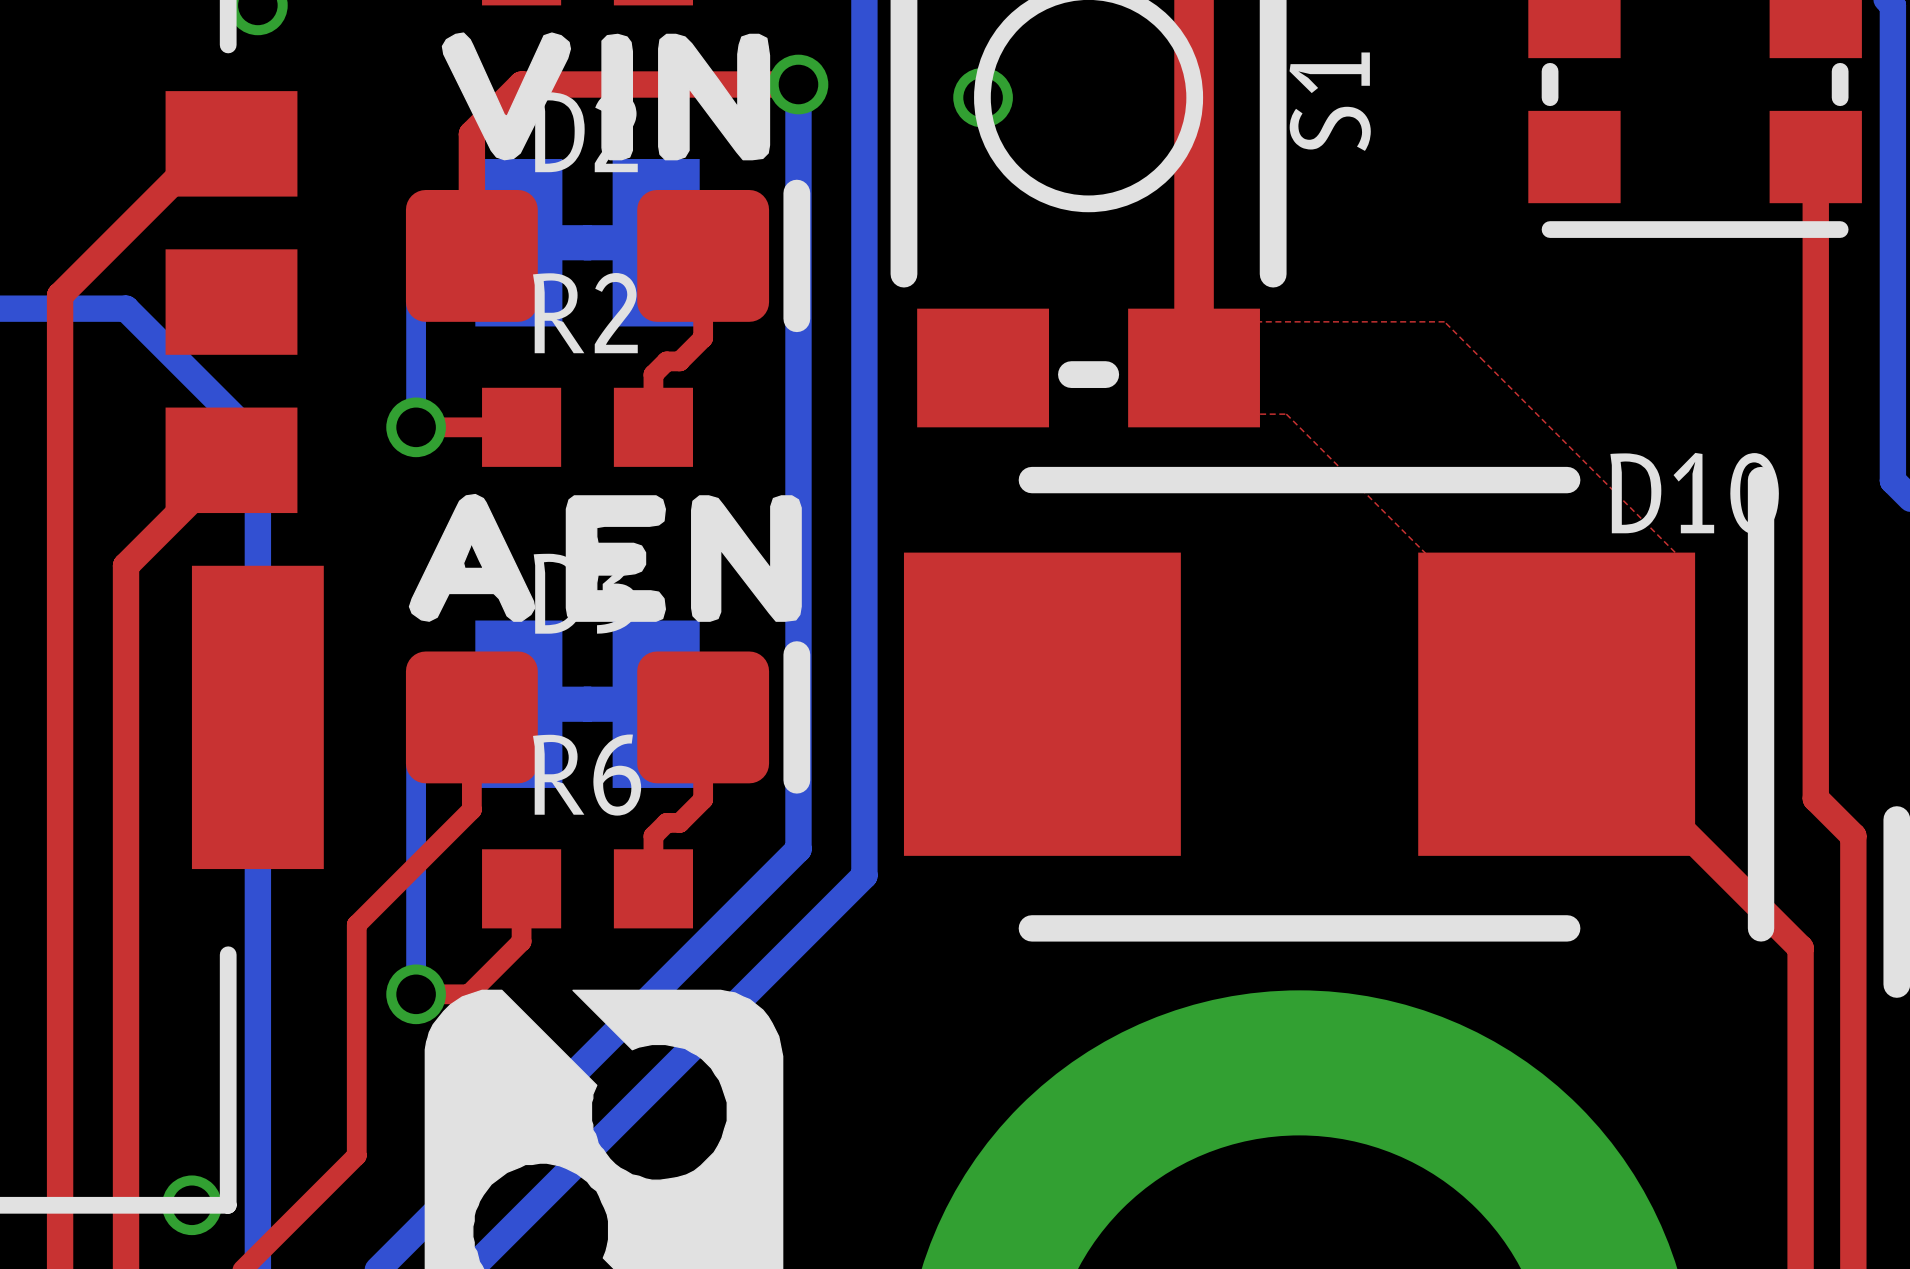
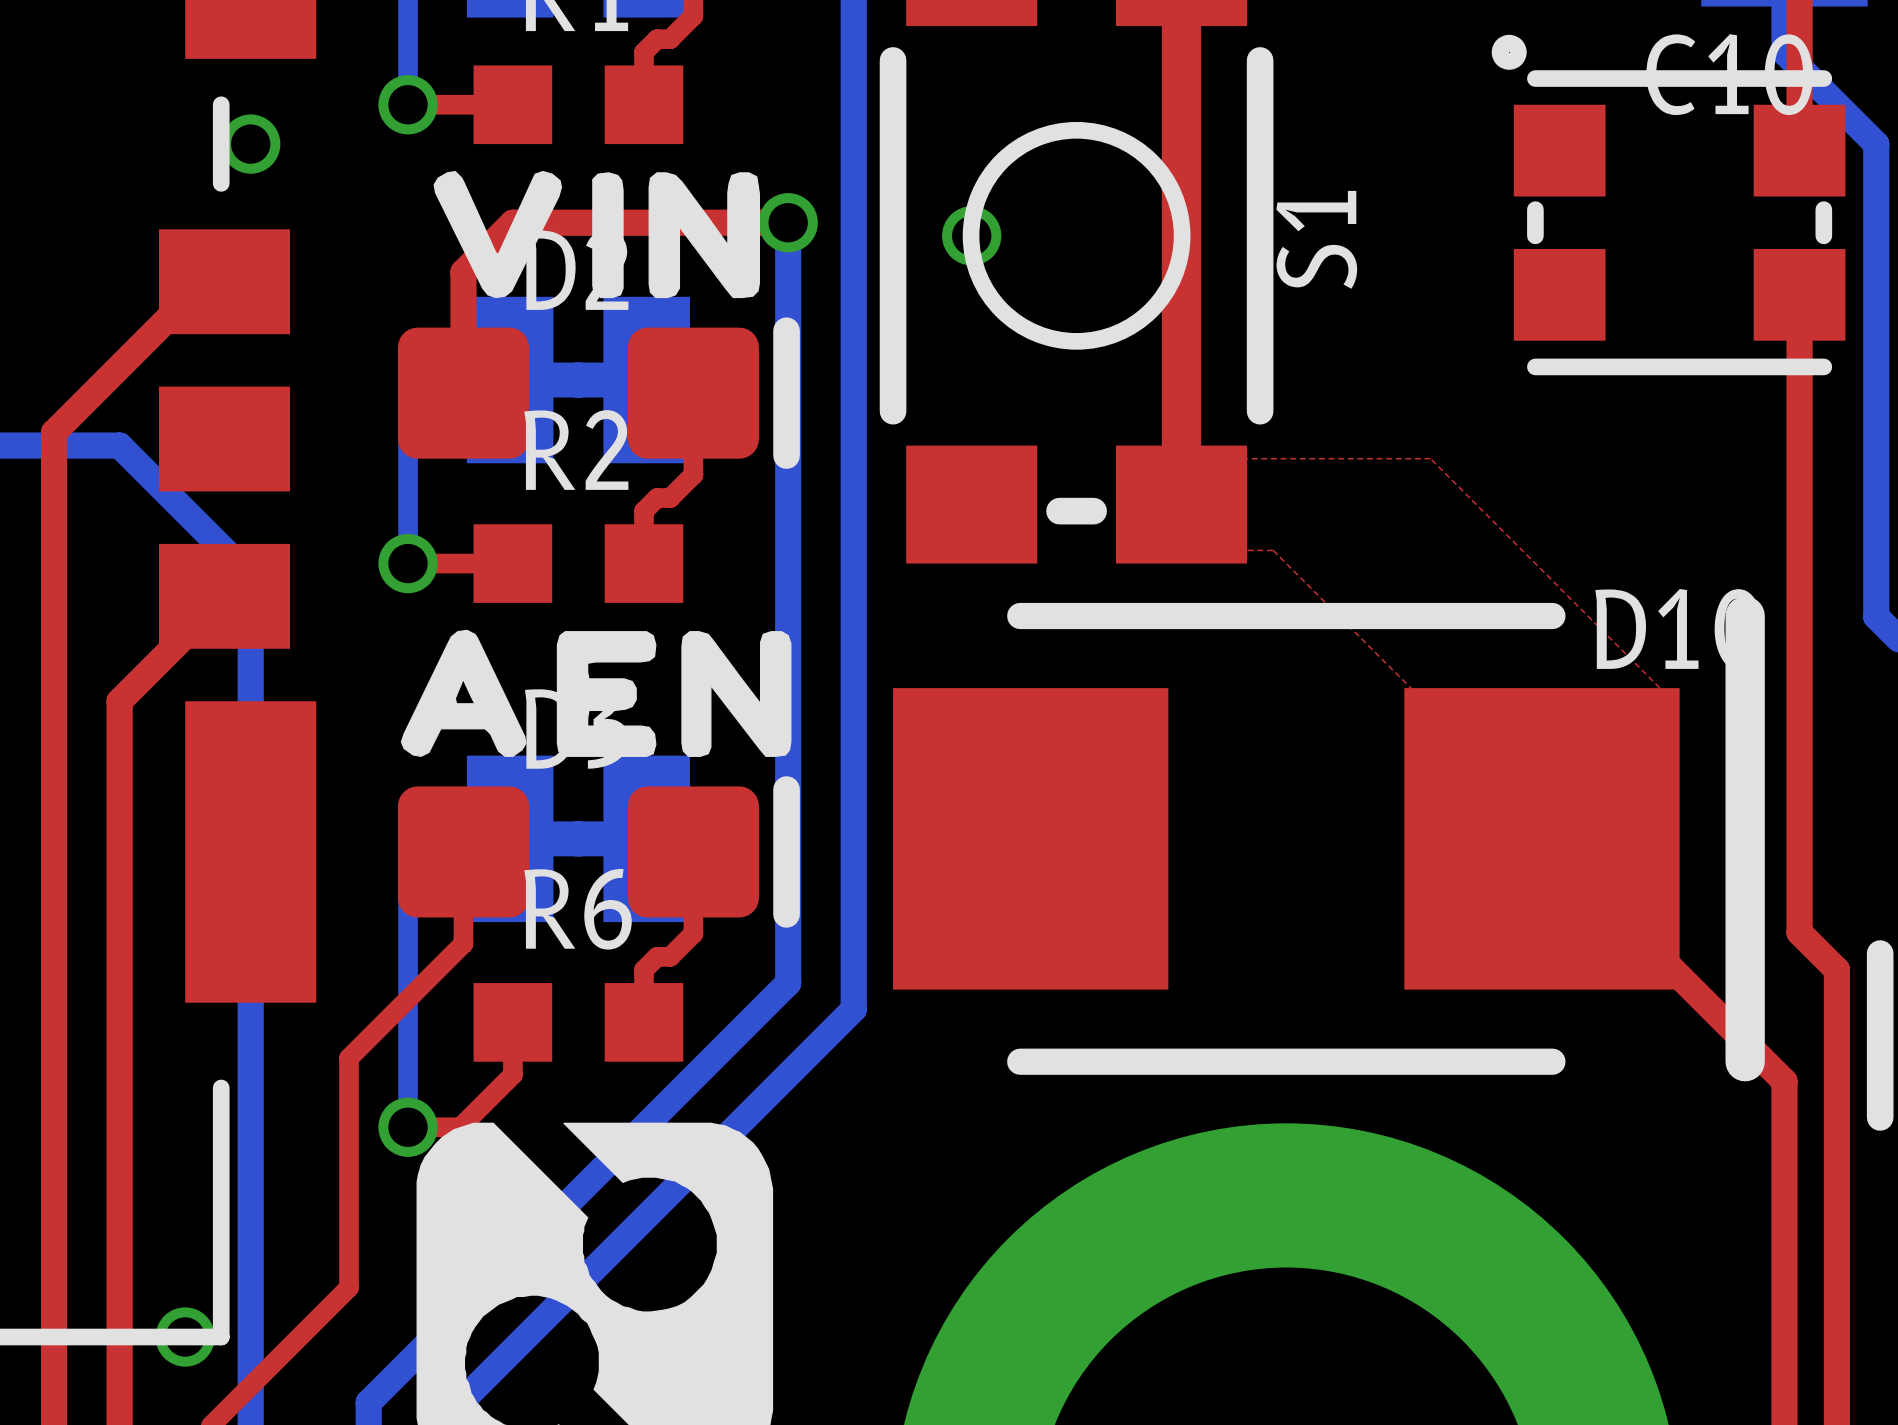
part footprint: [903, 466, 1775, 942] -> [893, 596, 1765, 1082]

